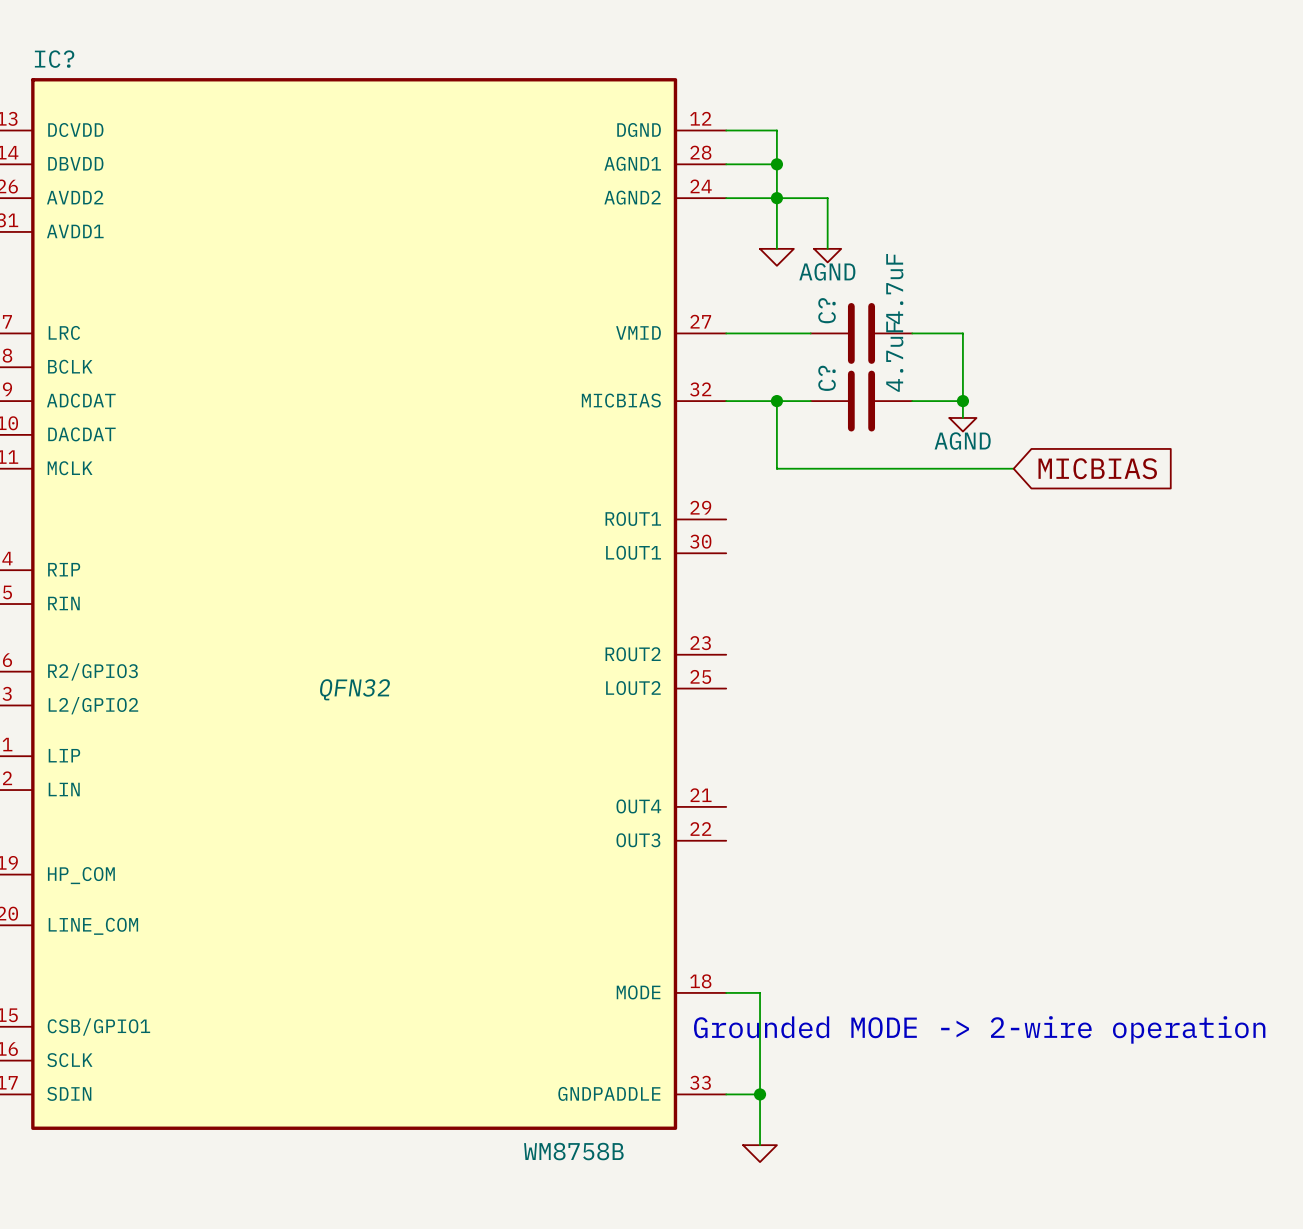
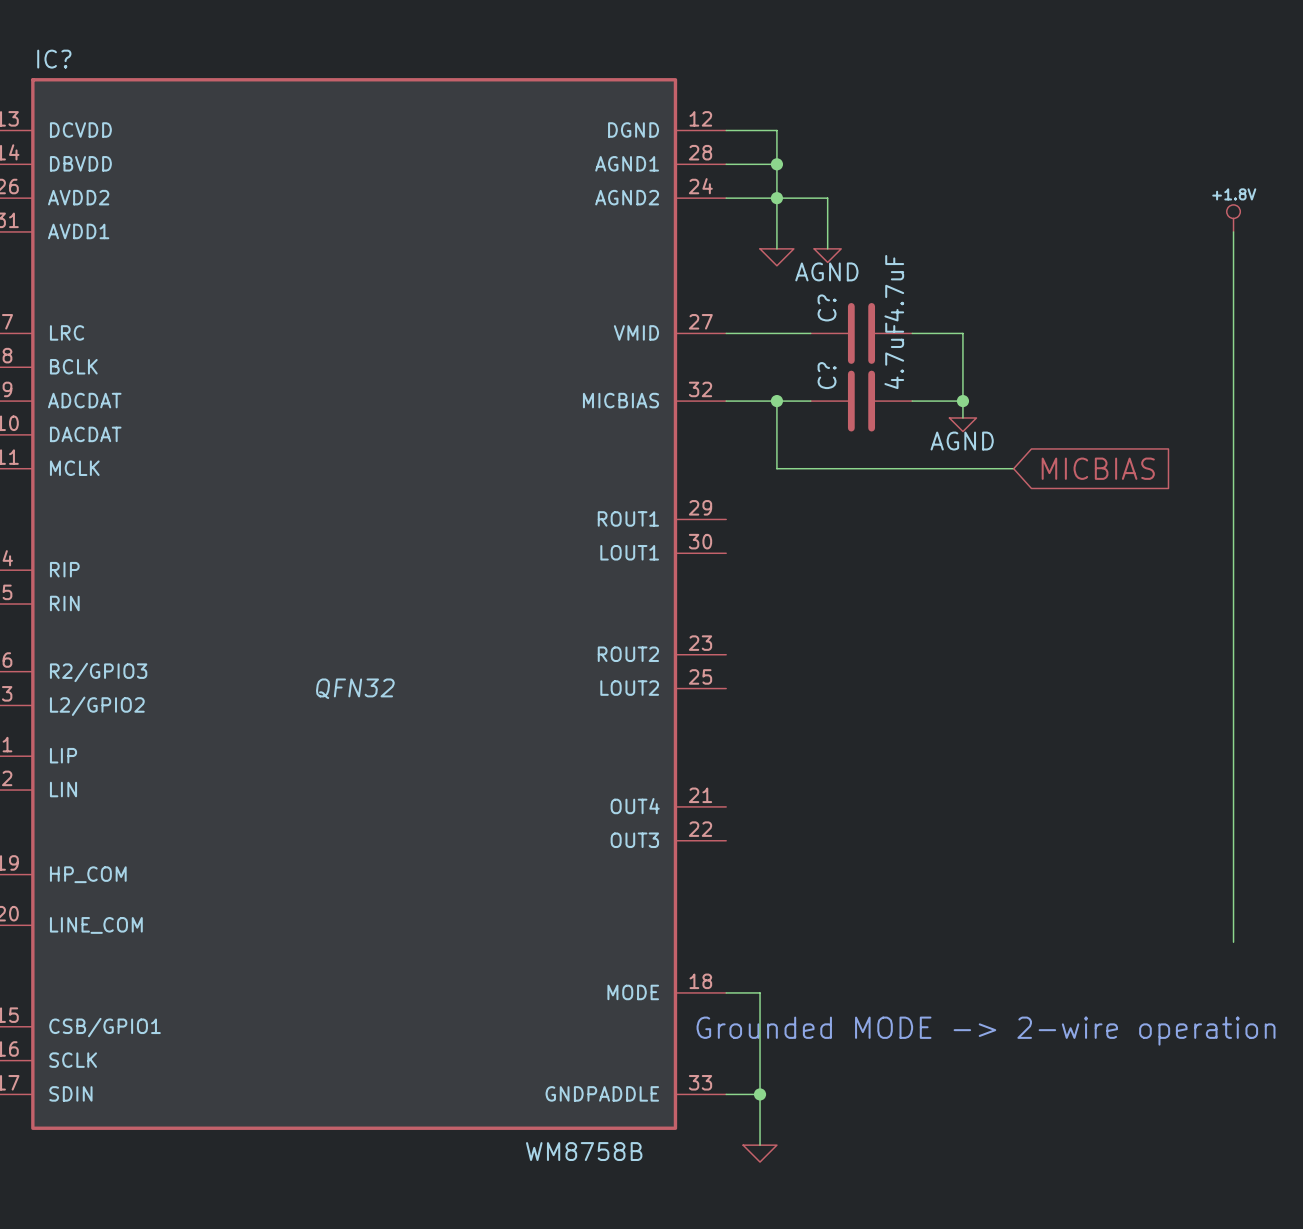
power symbol: none -> +1.8V (1233, 218)
wire: none -> (1233, 231) (1233, 942)

